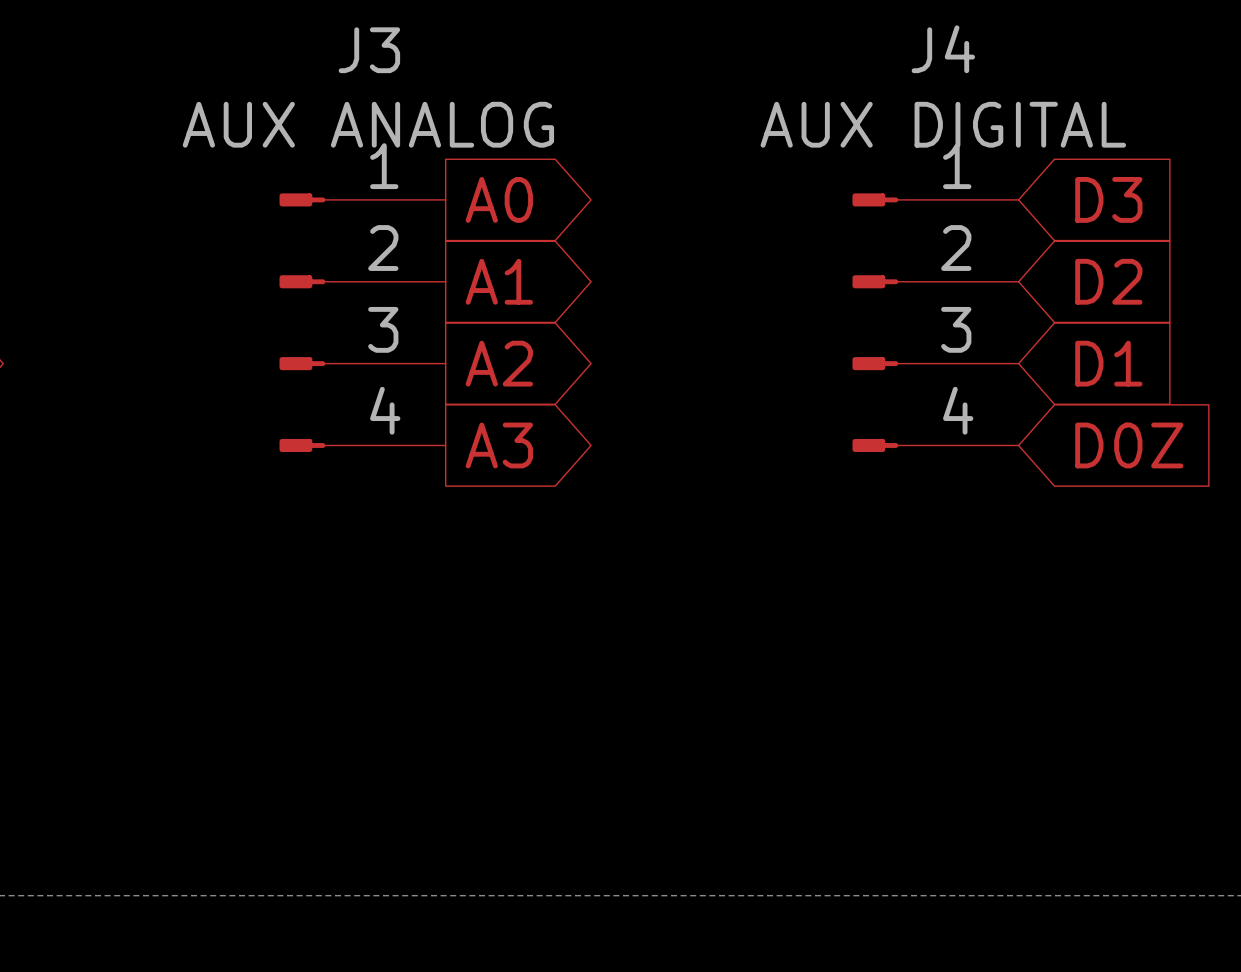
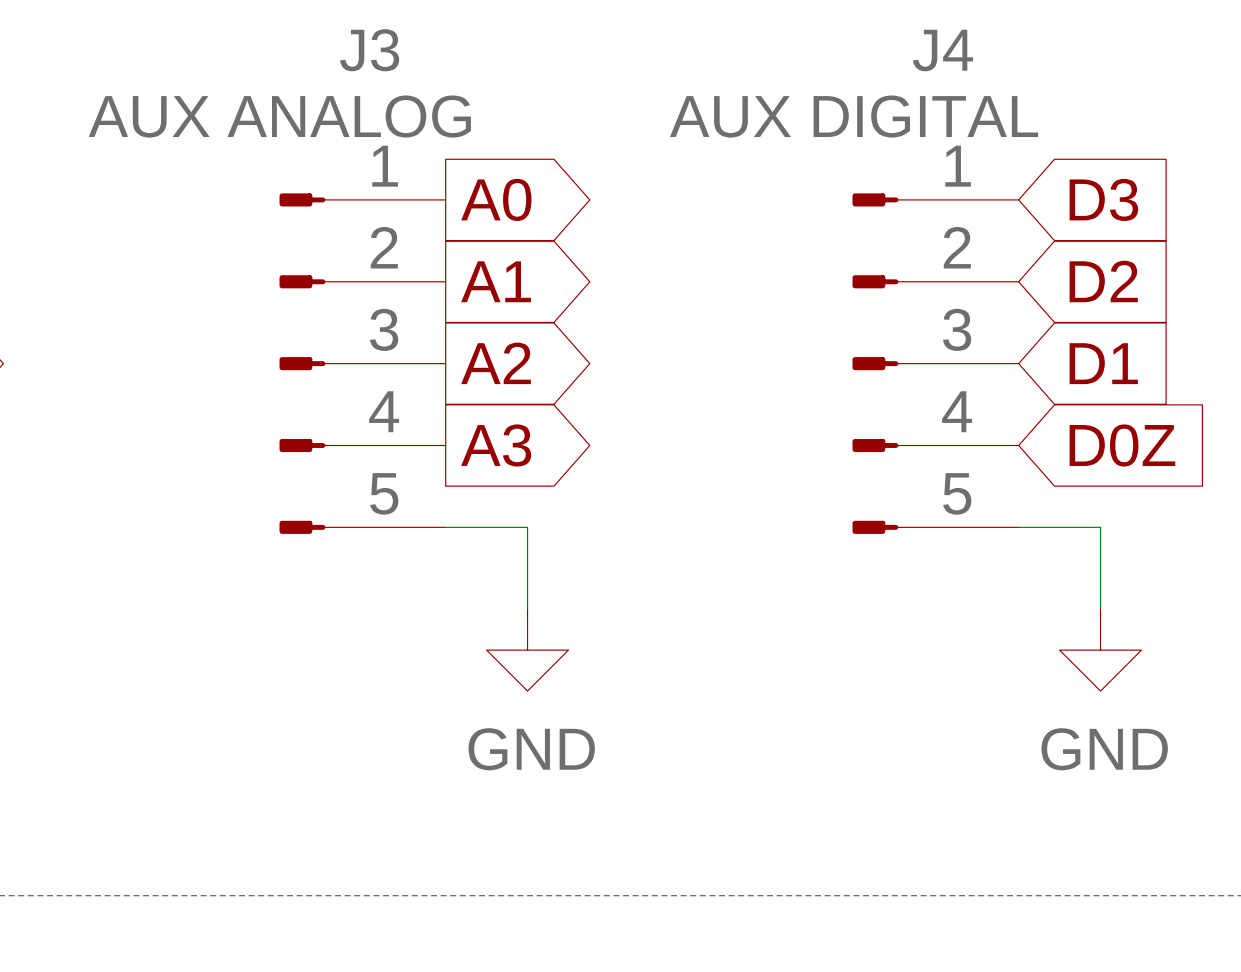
J3 value position: AUX ANALOG (368, 124) -> AUX ANALOG (279, 116)
J4 value position: AUX DIGITAL (943, 124) -> AUX DIGITAL (854, 116)
J3 symbol: [279, 193, 446, 453] -> [279, 193, 446, 534]
J4 symbol: [852, 193, 1019, 453] -> [852, 193, 1019, 534]
wire: none -> (445, 527) (527, 527) (527, 609)
wire: none -> (1018, 527) (1100, 527) (1100, 609)
power symbol: none -> GND (527, 650)
power symbol: none -> GND (1100, 650)

